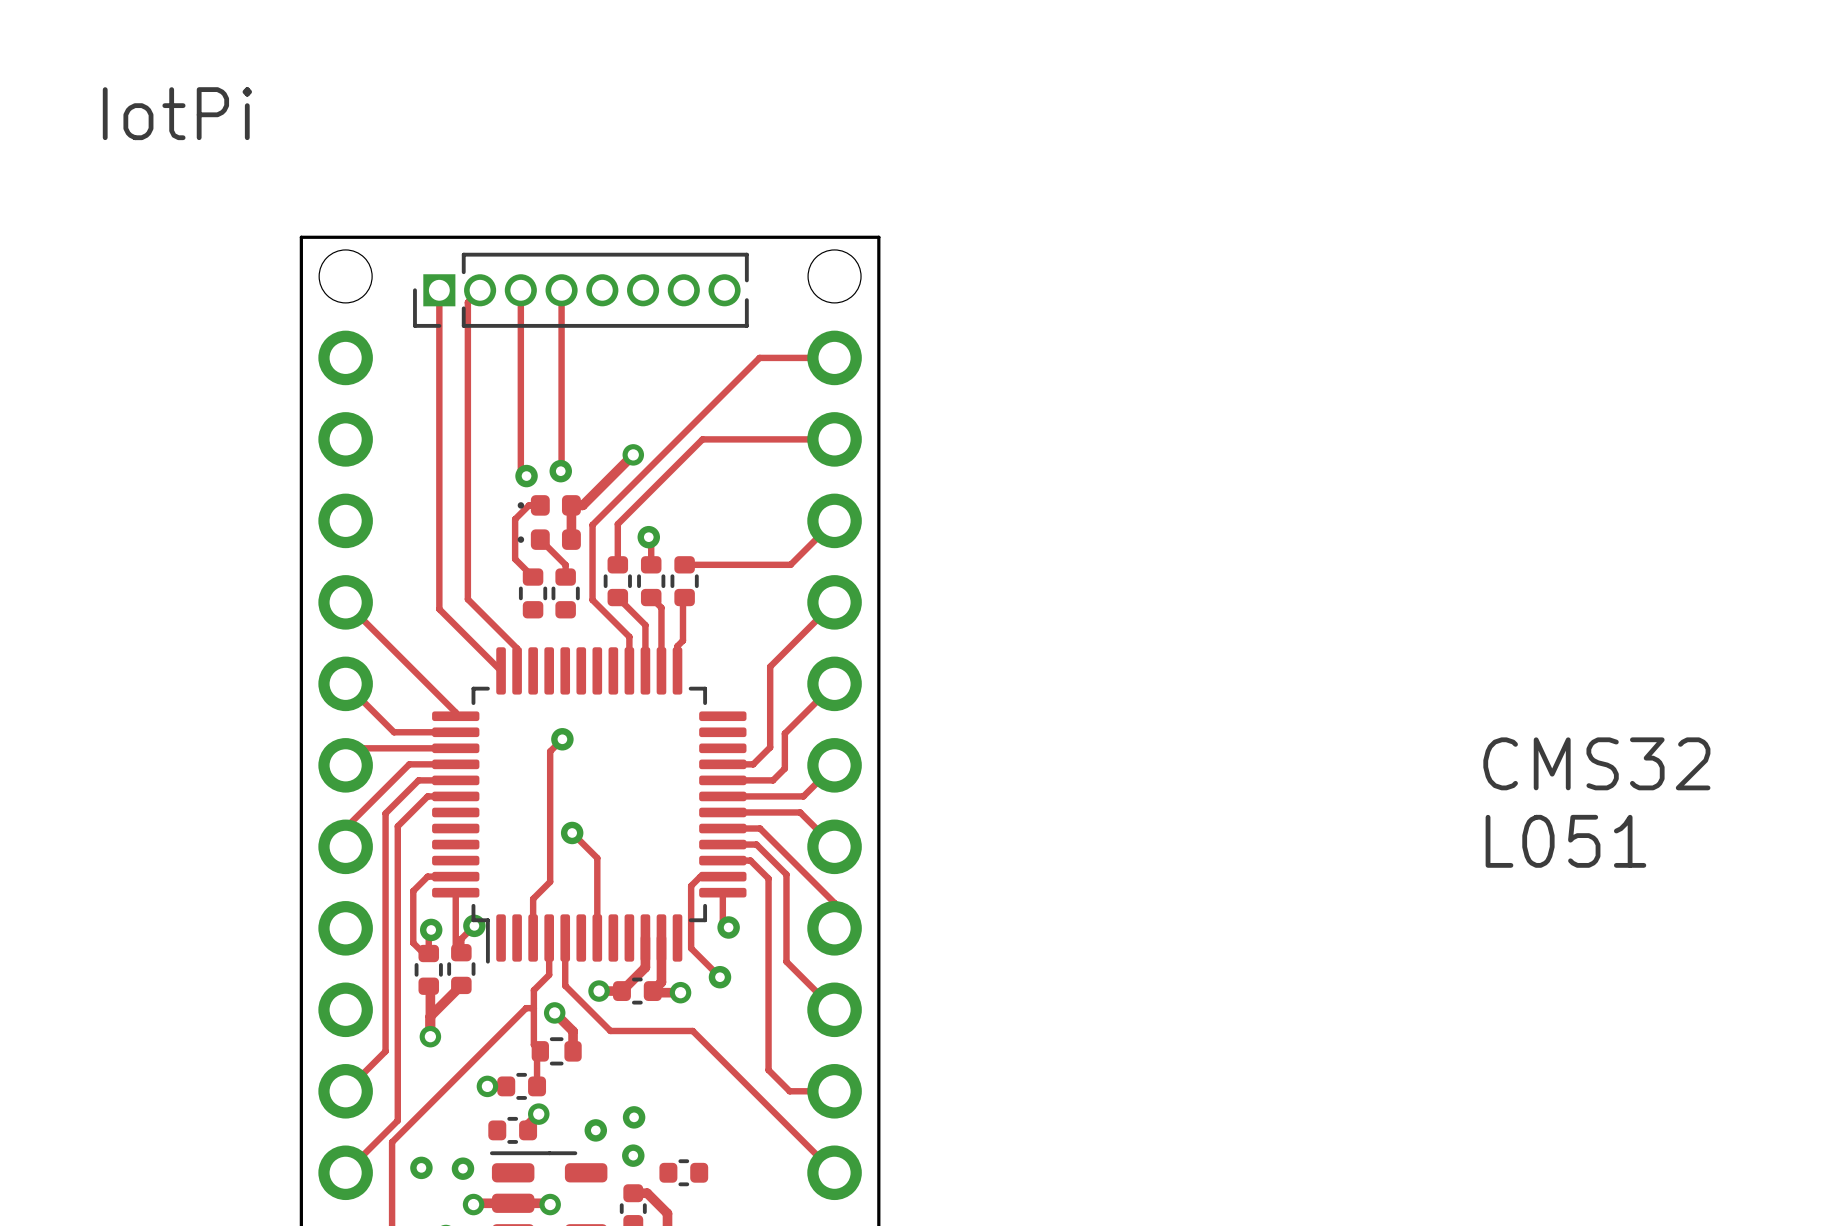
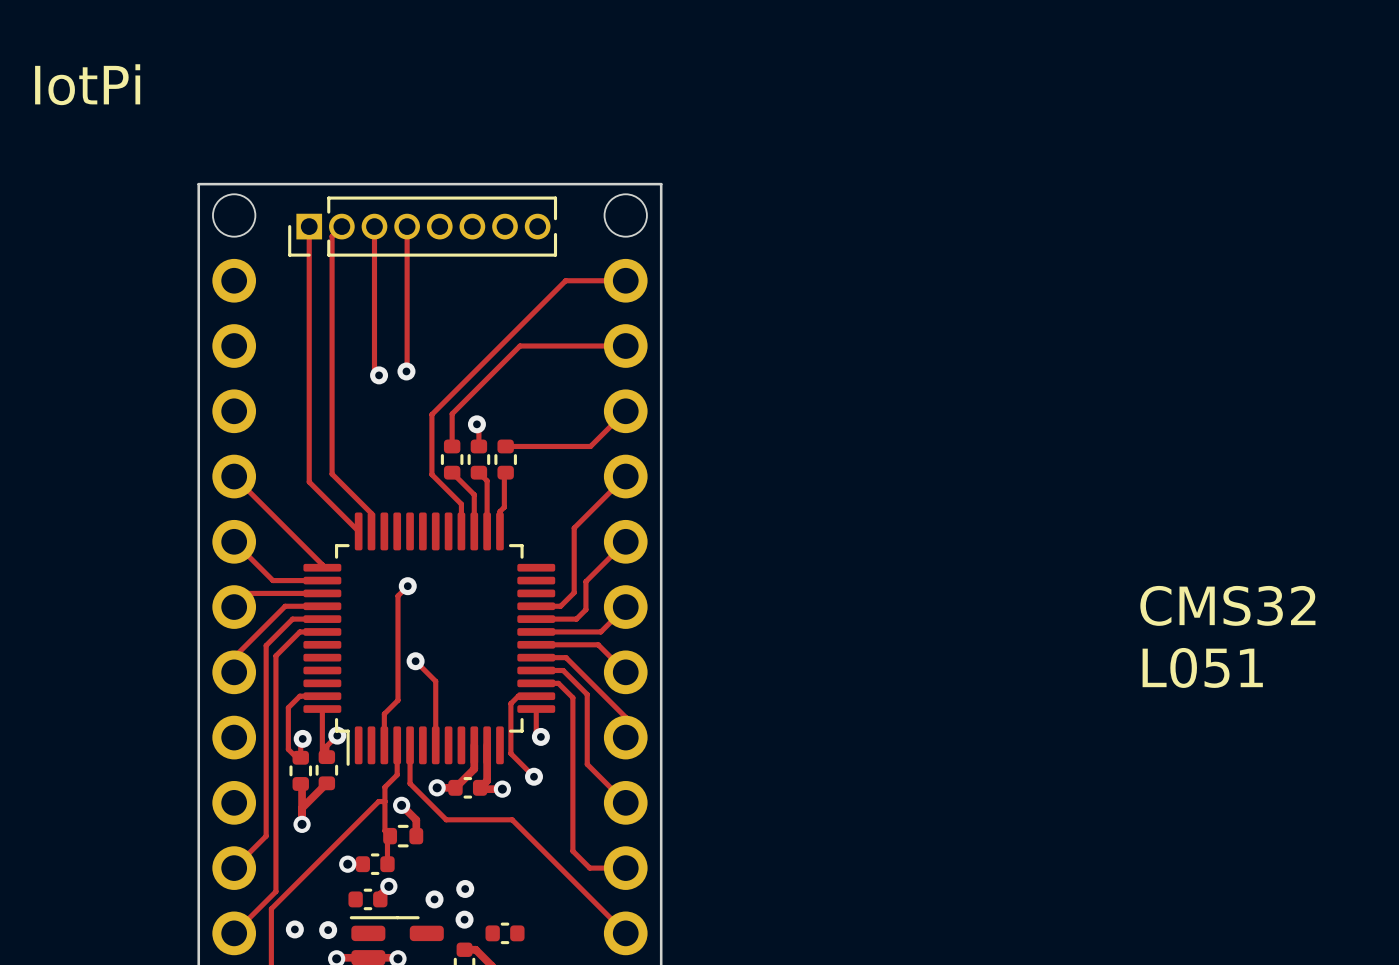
track: (633, 454) (582, 505) (571, 505) (571, 539) -> none
via: (633, 454) -> none
track: (540, 505) (528, 505) (515, 519) (515, 559) (533, 577) -> none
part: (549, 505) -> none
track: (540, 539) (565, 564) (565, 577) -> none
part: (549, 539) -> none
part: (533, 593) -> none
part: (565, 593) -> none

